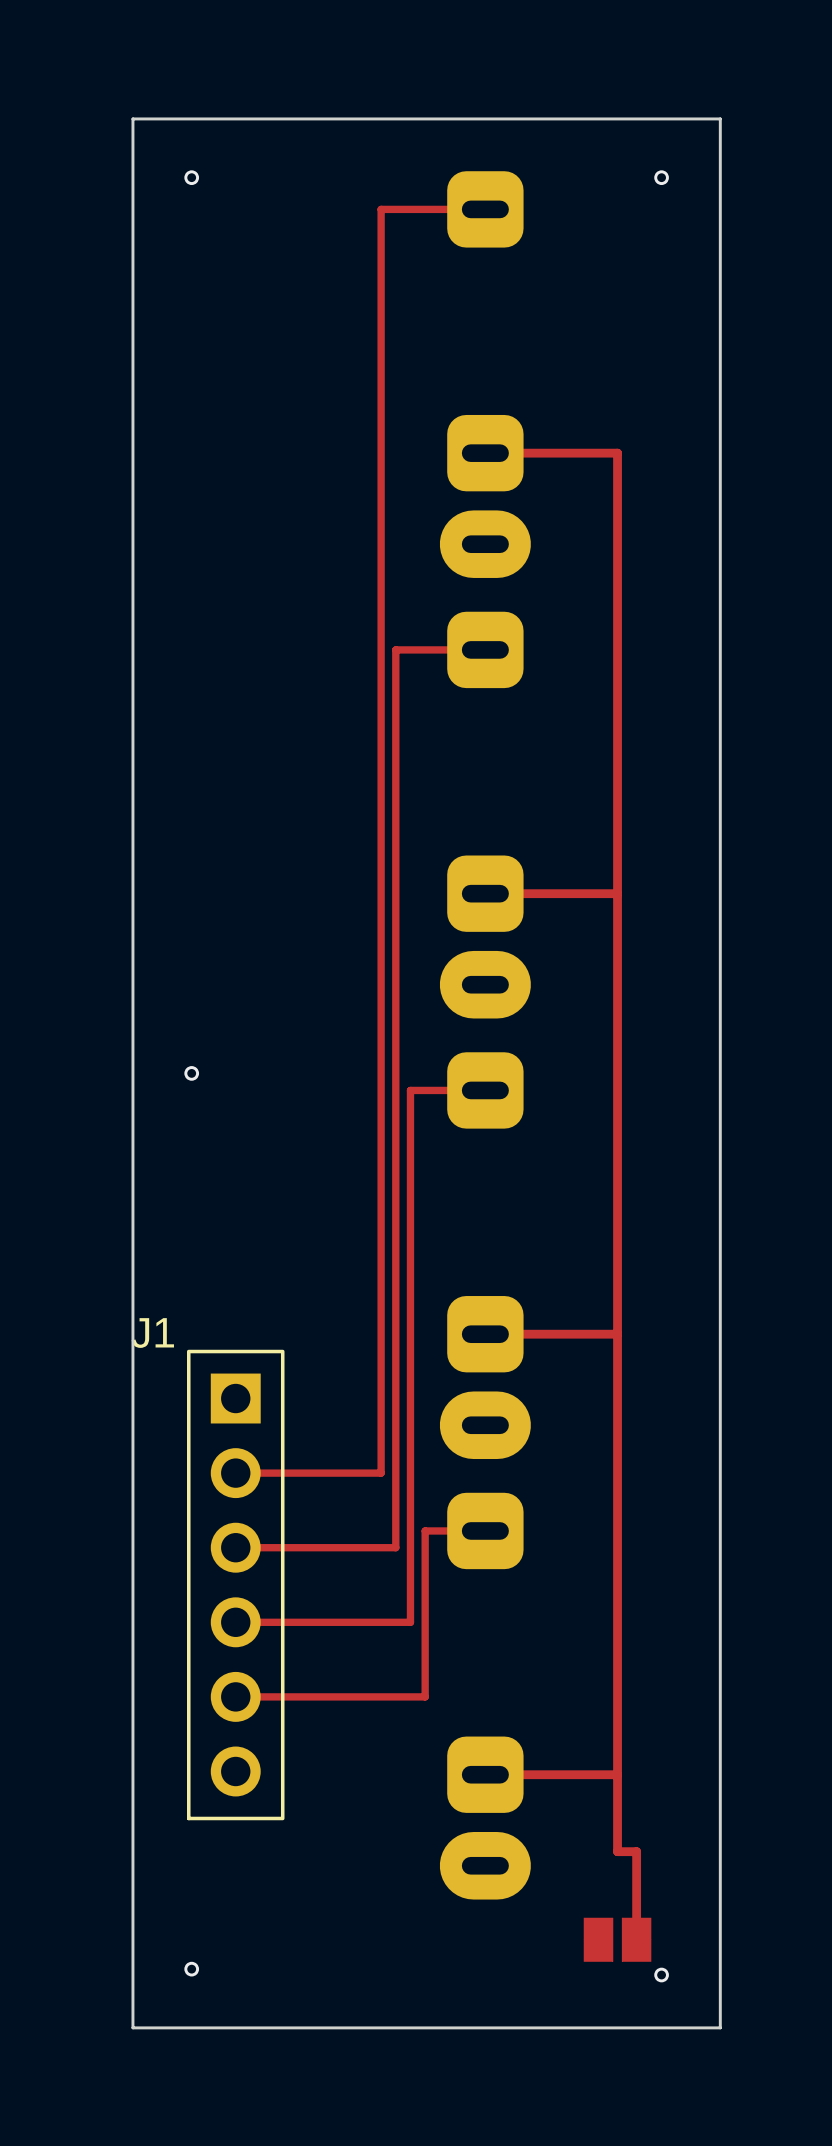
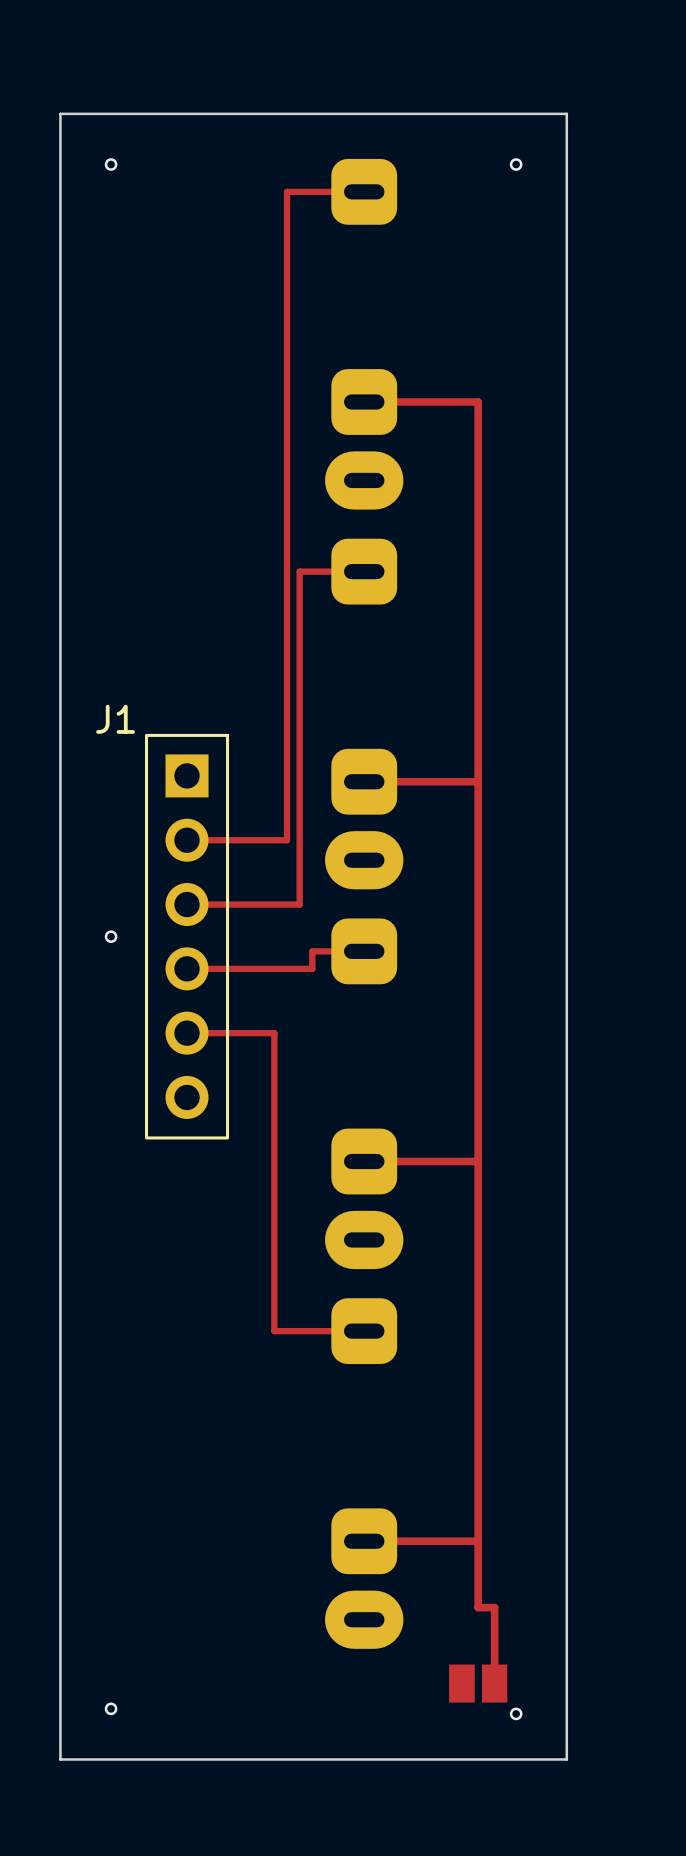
top track: (395, 209) (381, 209) (381, 1185) -> (287, 191) (287, 571)
top track: (410, 649) (395, 649) -> (299, 571) (299, 904) (187, 904)
top track: (395, 961) (395, 1547) (235, 1547) -> (287, 840) (187, 840)
top track: (425, 1090) (410, 1090) (410, 1622) (235, 1622) -> (312, 951) (312, 968) (187, 968)
top track: none -> (274, 1033) (187, 1033)
top track: (381, 1473) (235, 1473) -> (274, 1281) (274, 1331) (312, 1331)
top track: (425, 1530) (425, 1696) (235, 1696) -> none
J1 position: (235, 1585) -> (187, 936)

